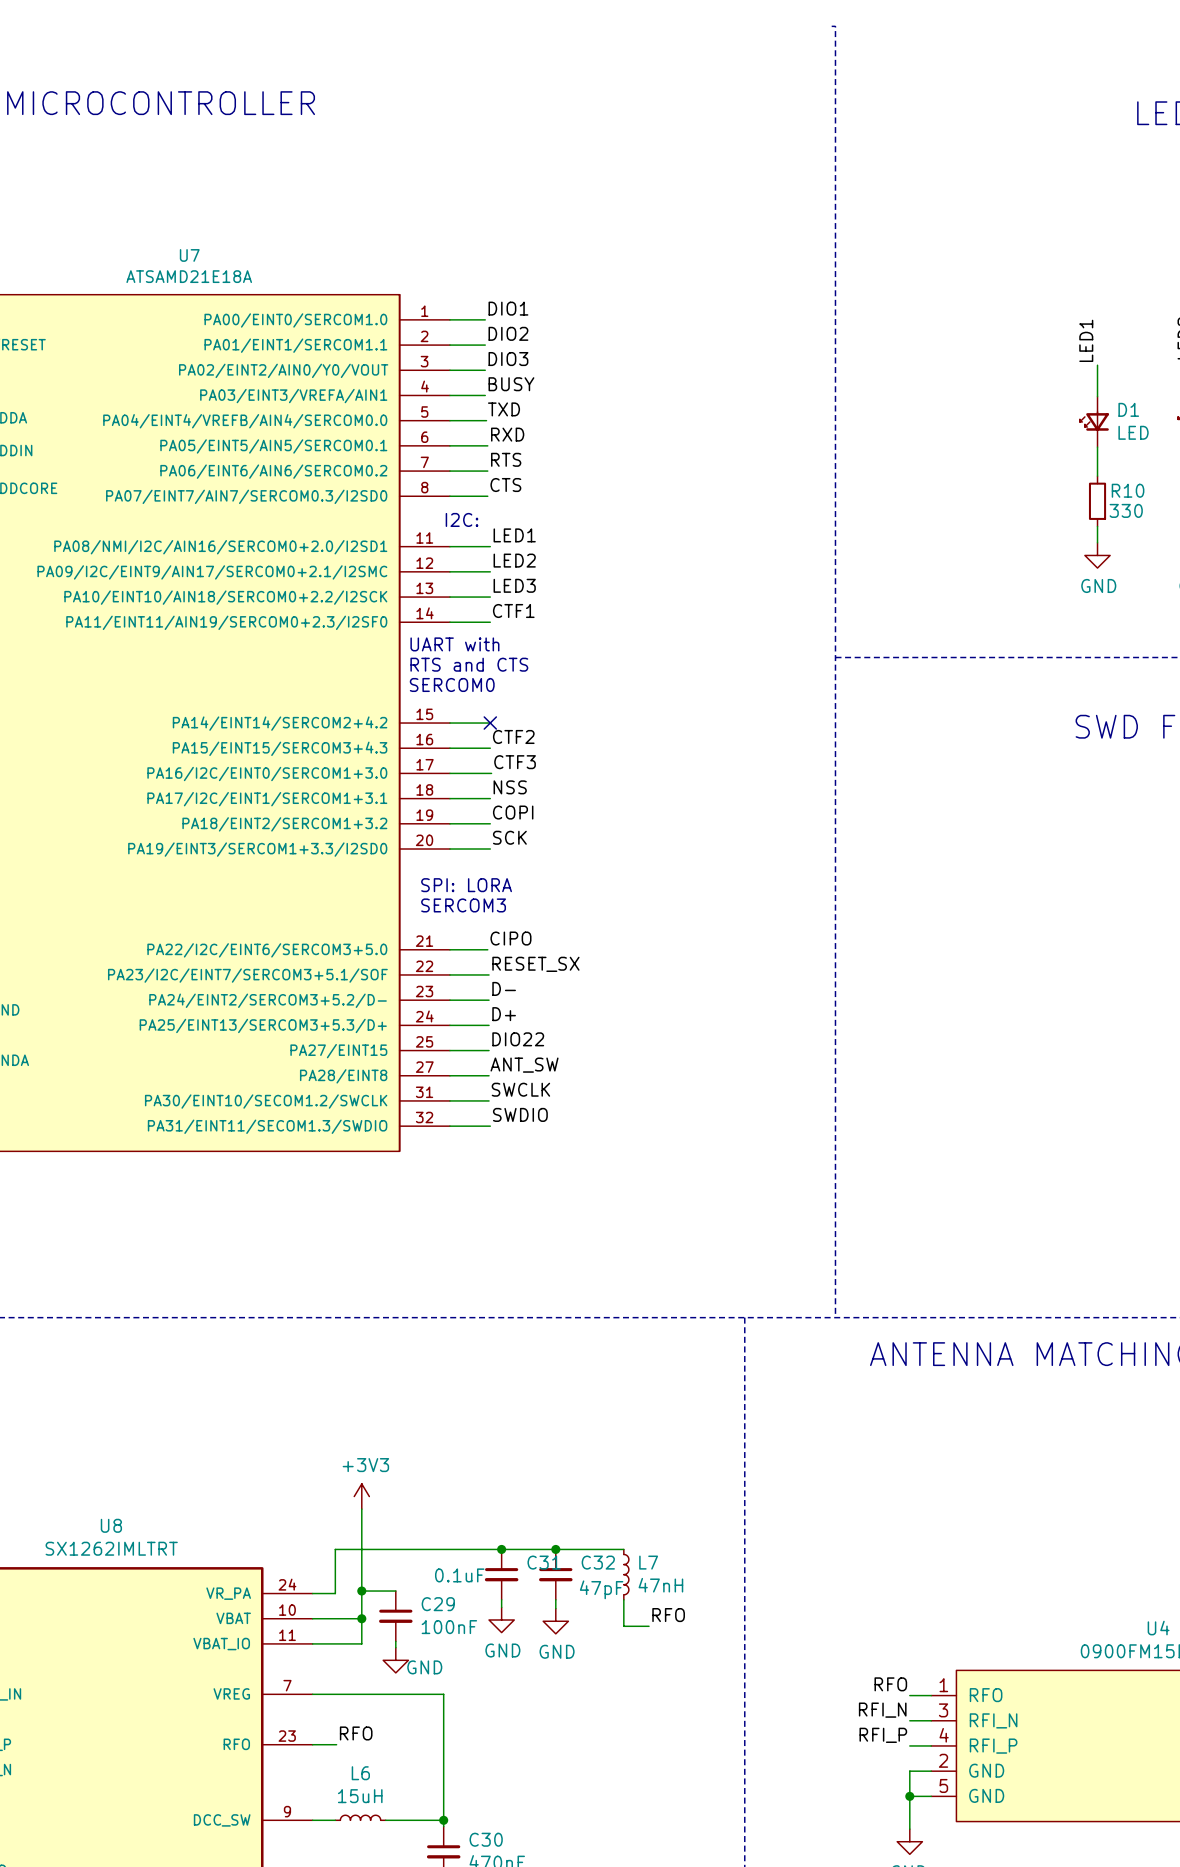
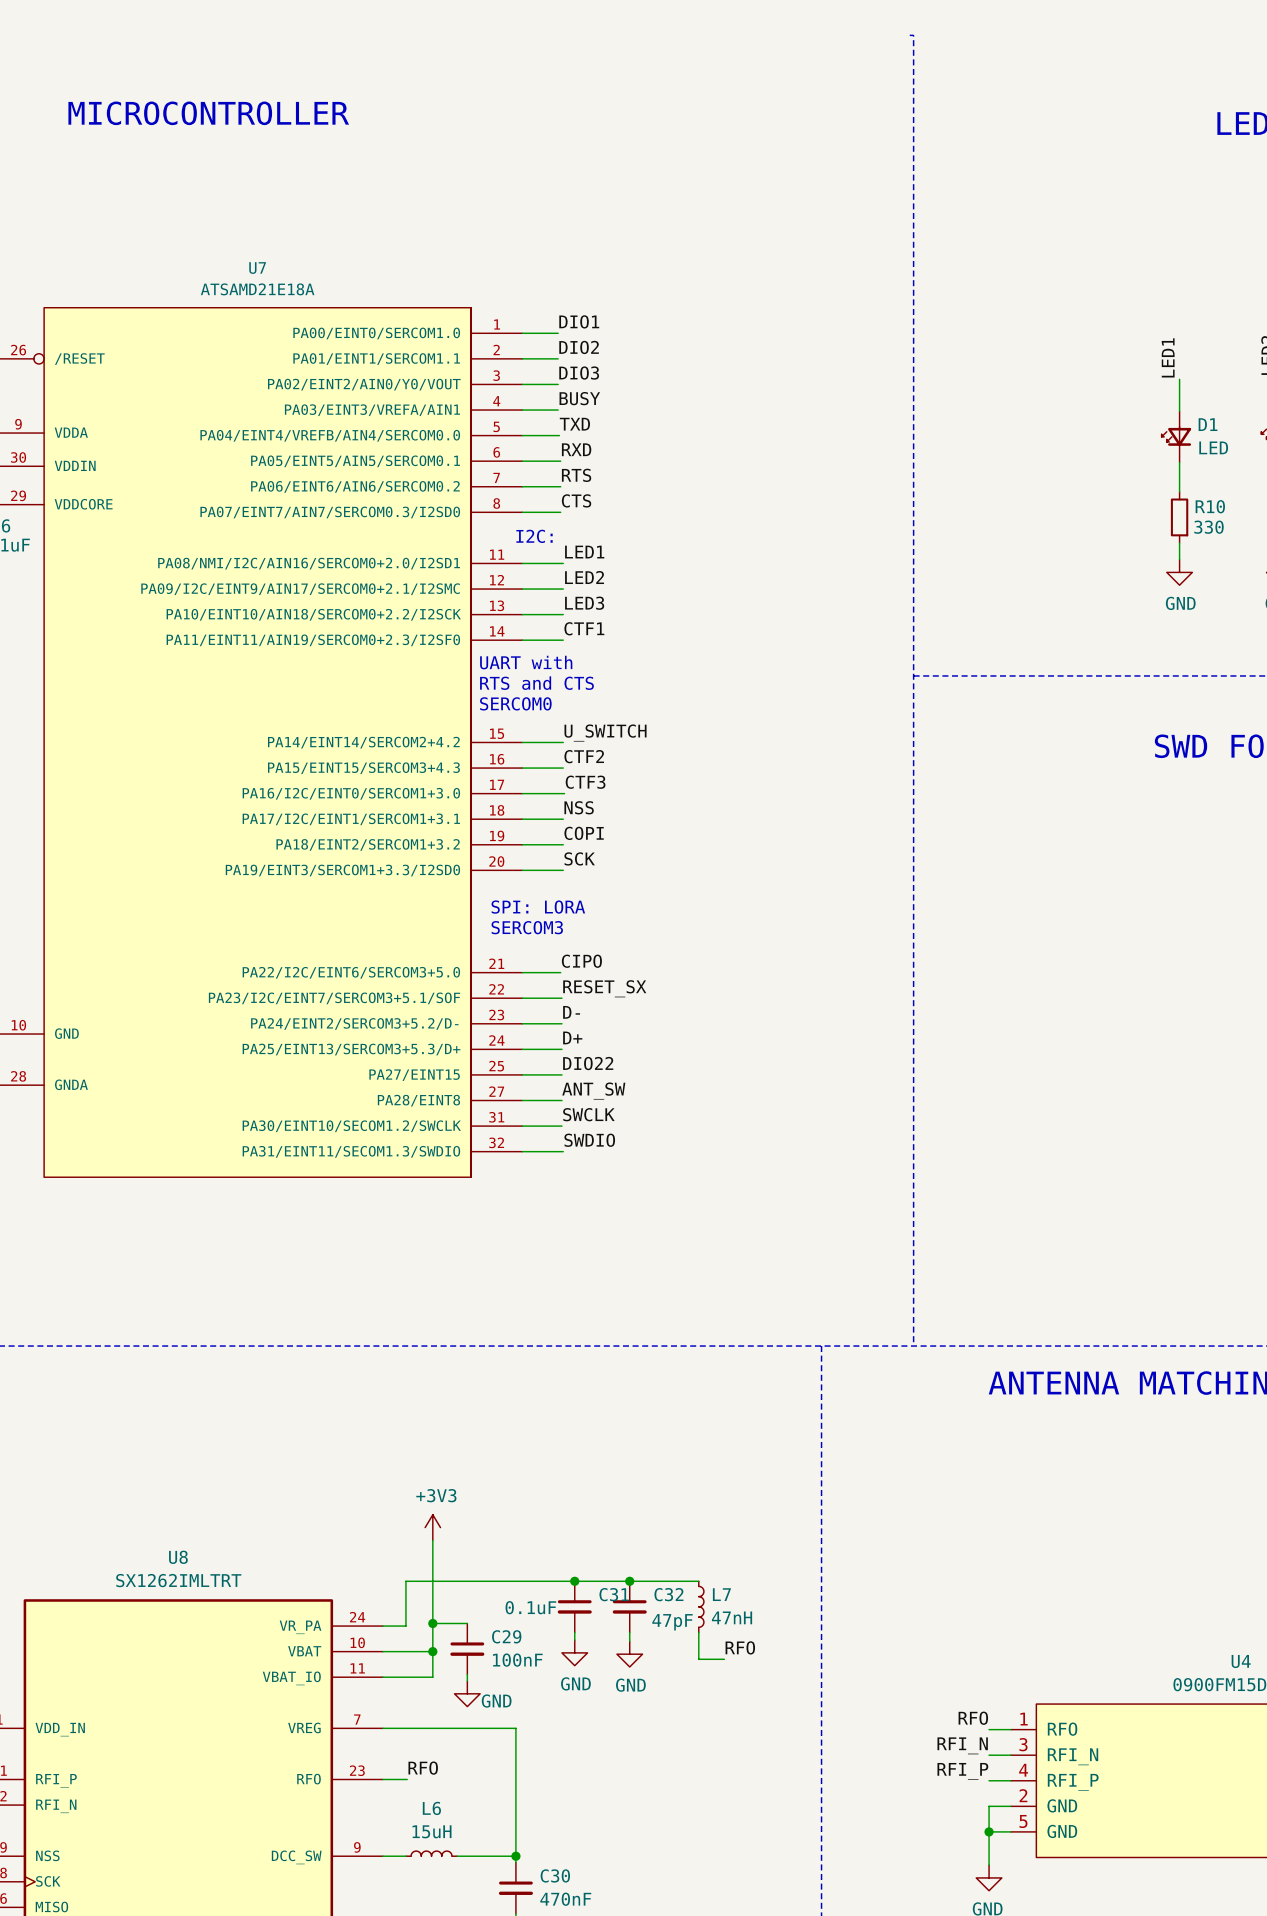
label: none -> U_SWITCH (605, 733)
no-connect mark: (490, 723) -> none

